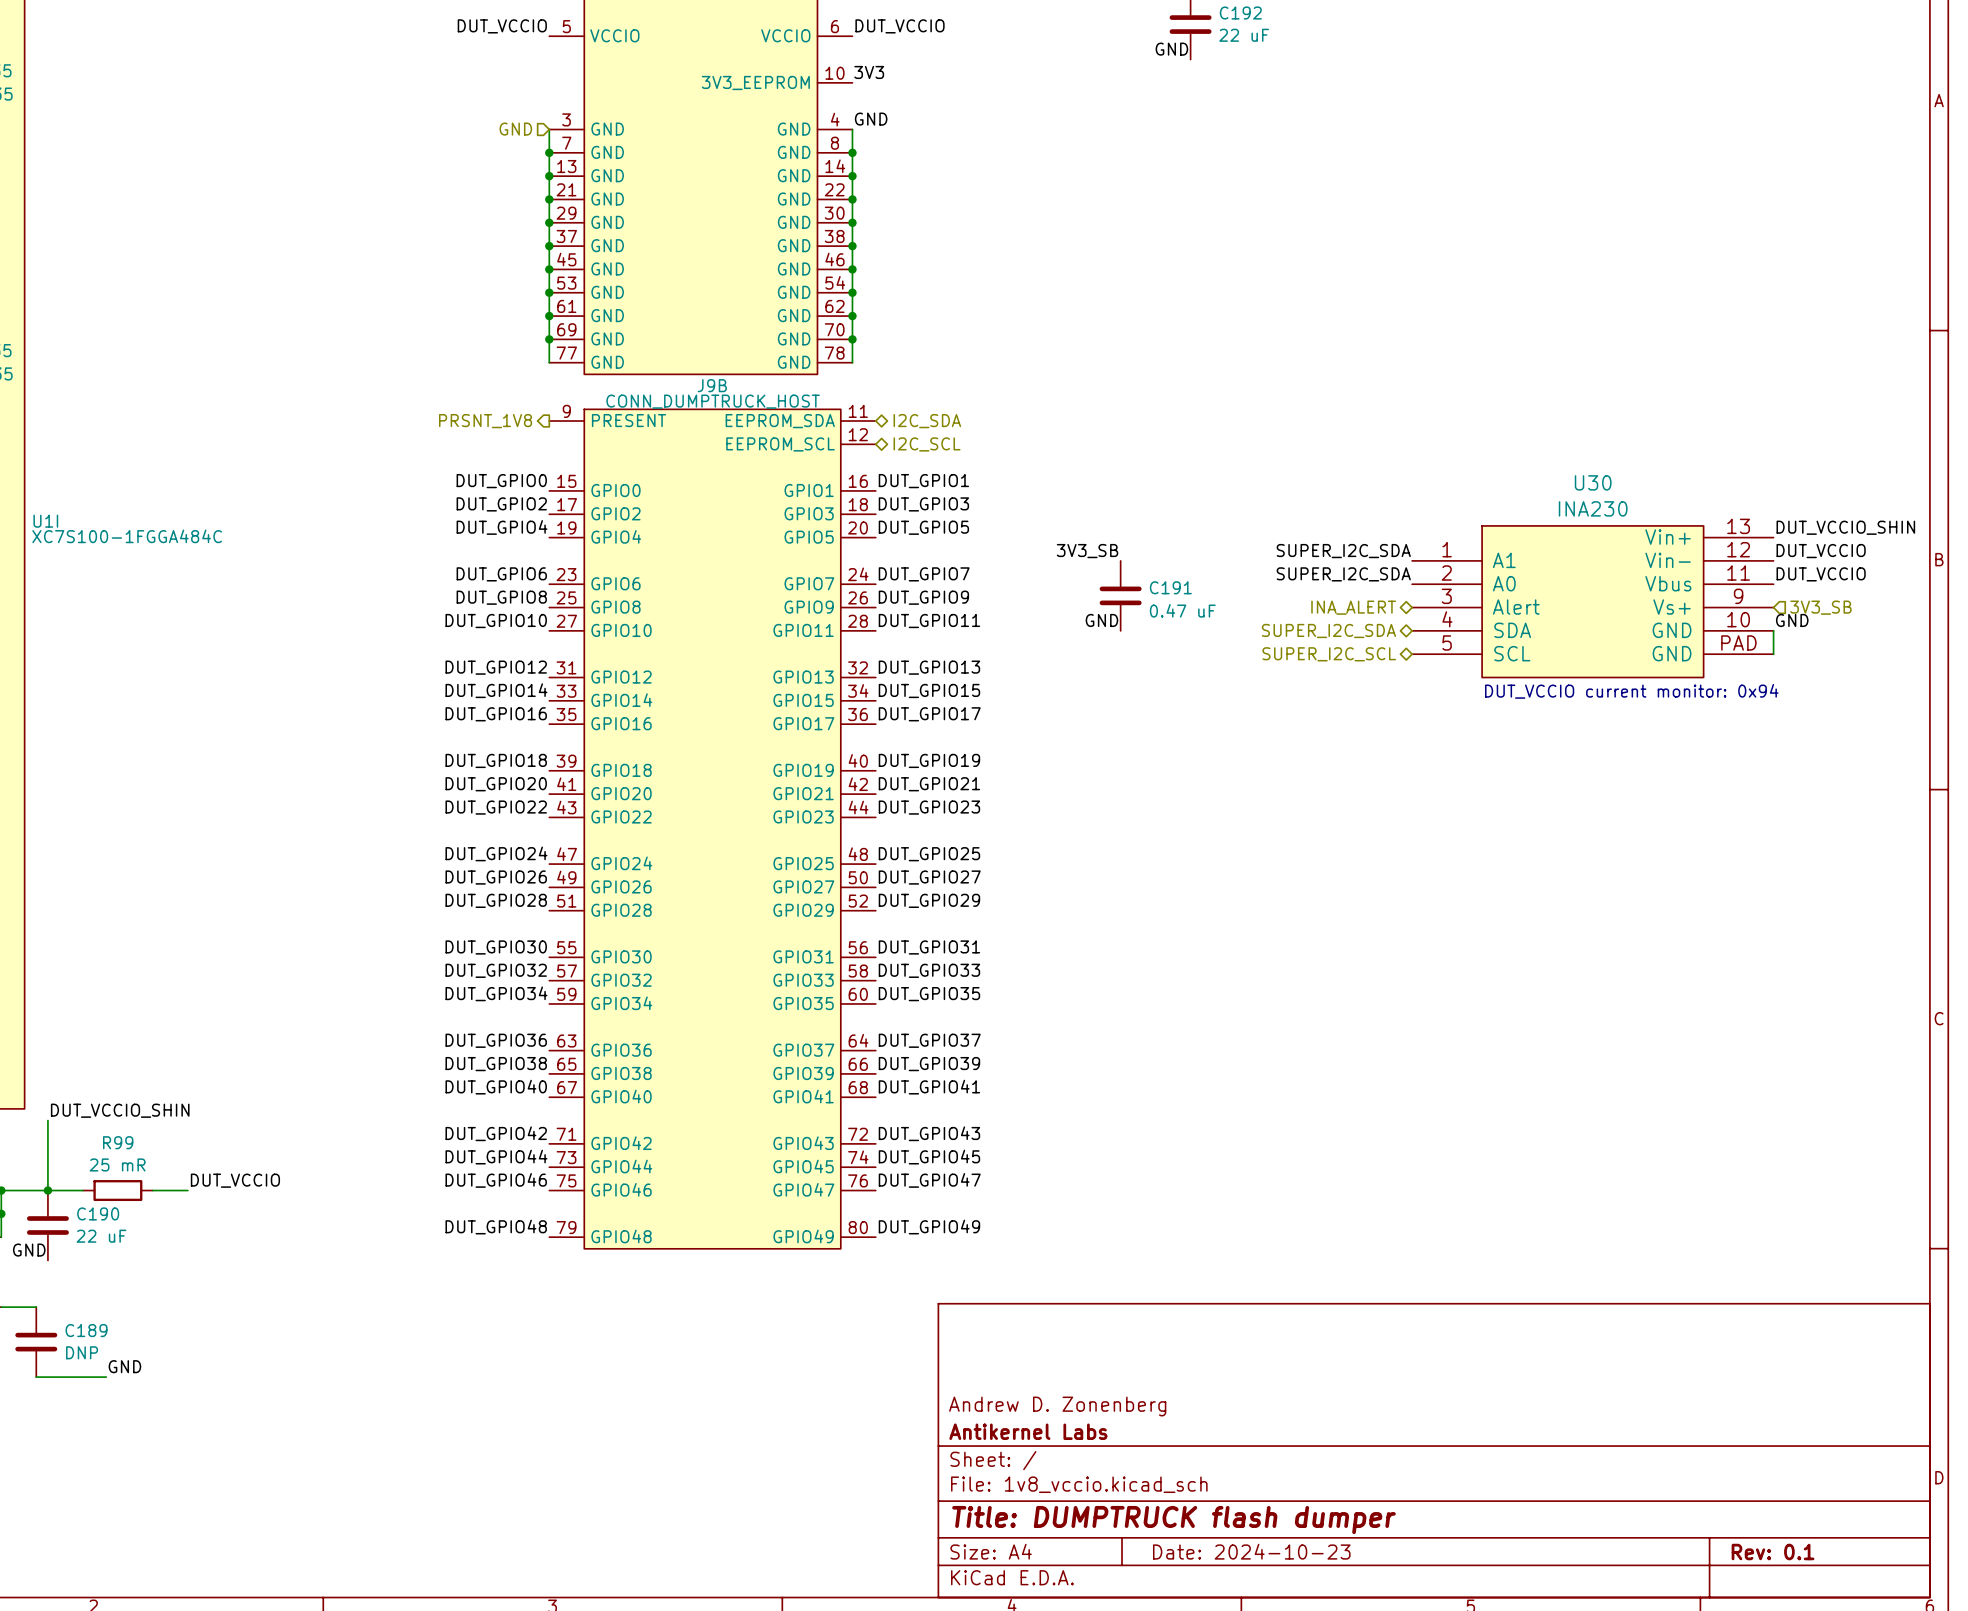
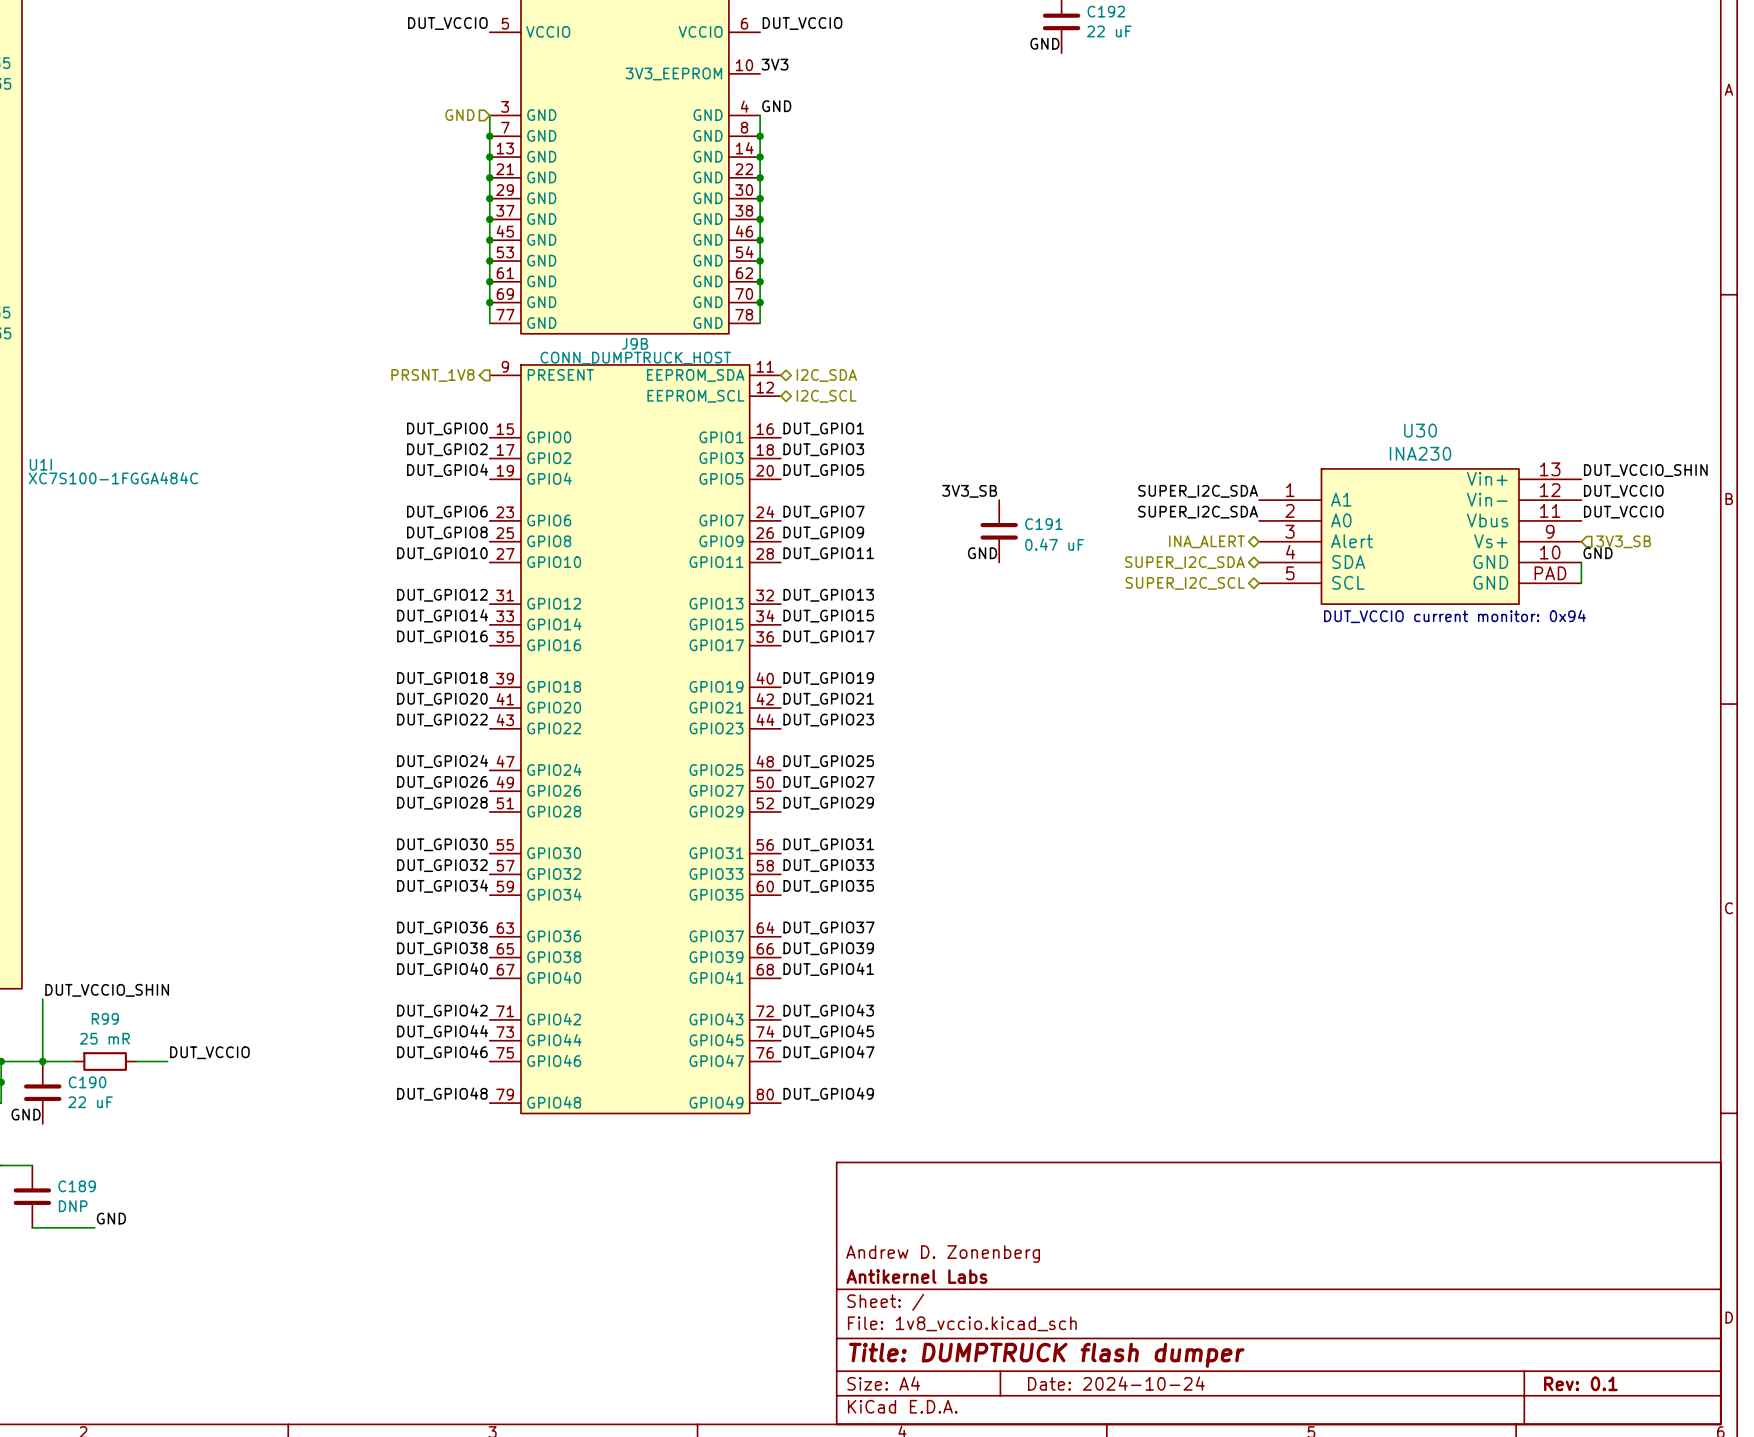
title block: Date: 2024-10-23 (1251, 1551) -> Date: 2024-10-24 (1116, 1383)

